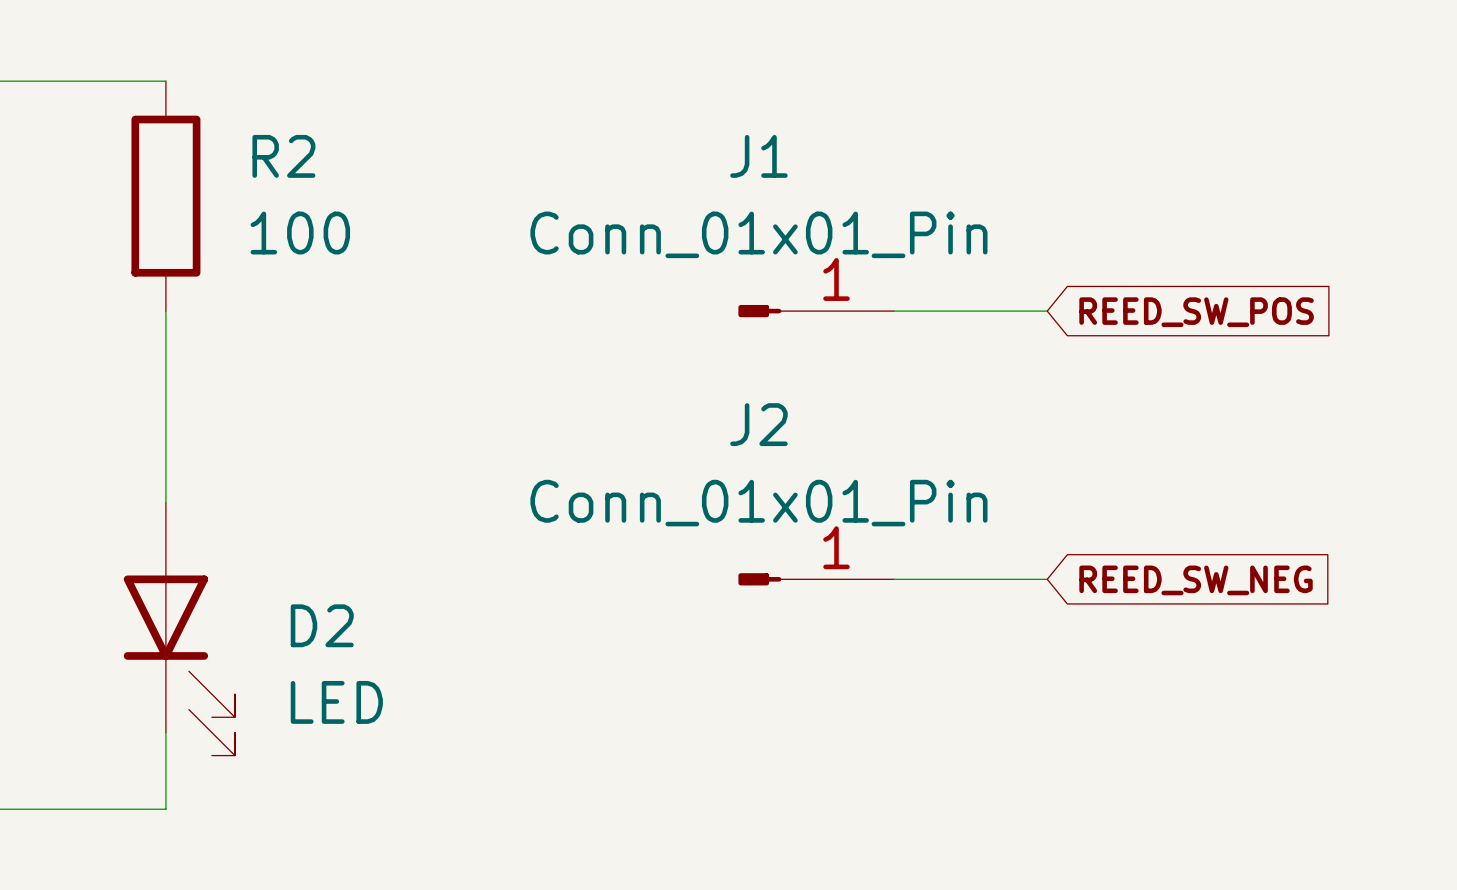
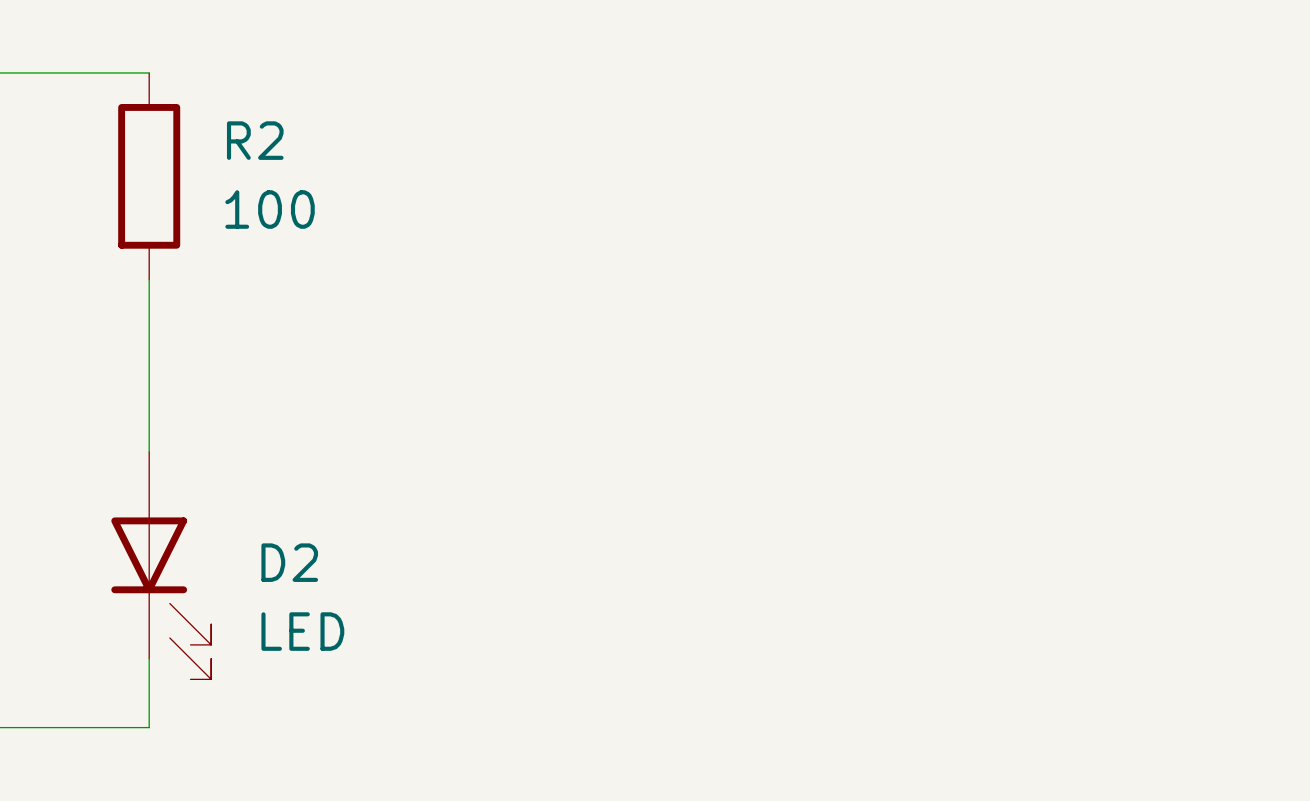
J1: Conn_01x01_Pin (816, 311) -> none
wire: (893, 311) (1047, 311) -> none
global label: REED_SW_POS (1196, 312) -> none
J2: Conn_01x01_Pin (816, 579) -> none
wire: (893, 579) (1047, 579) -> none
global label: REED_SW_NEG (1196, 580) -> none

